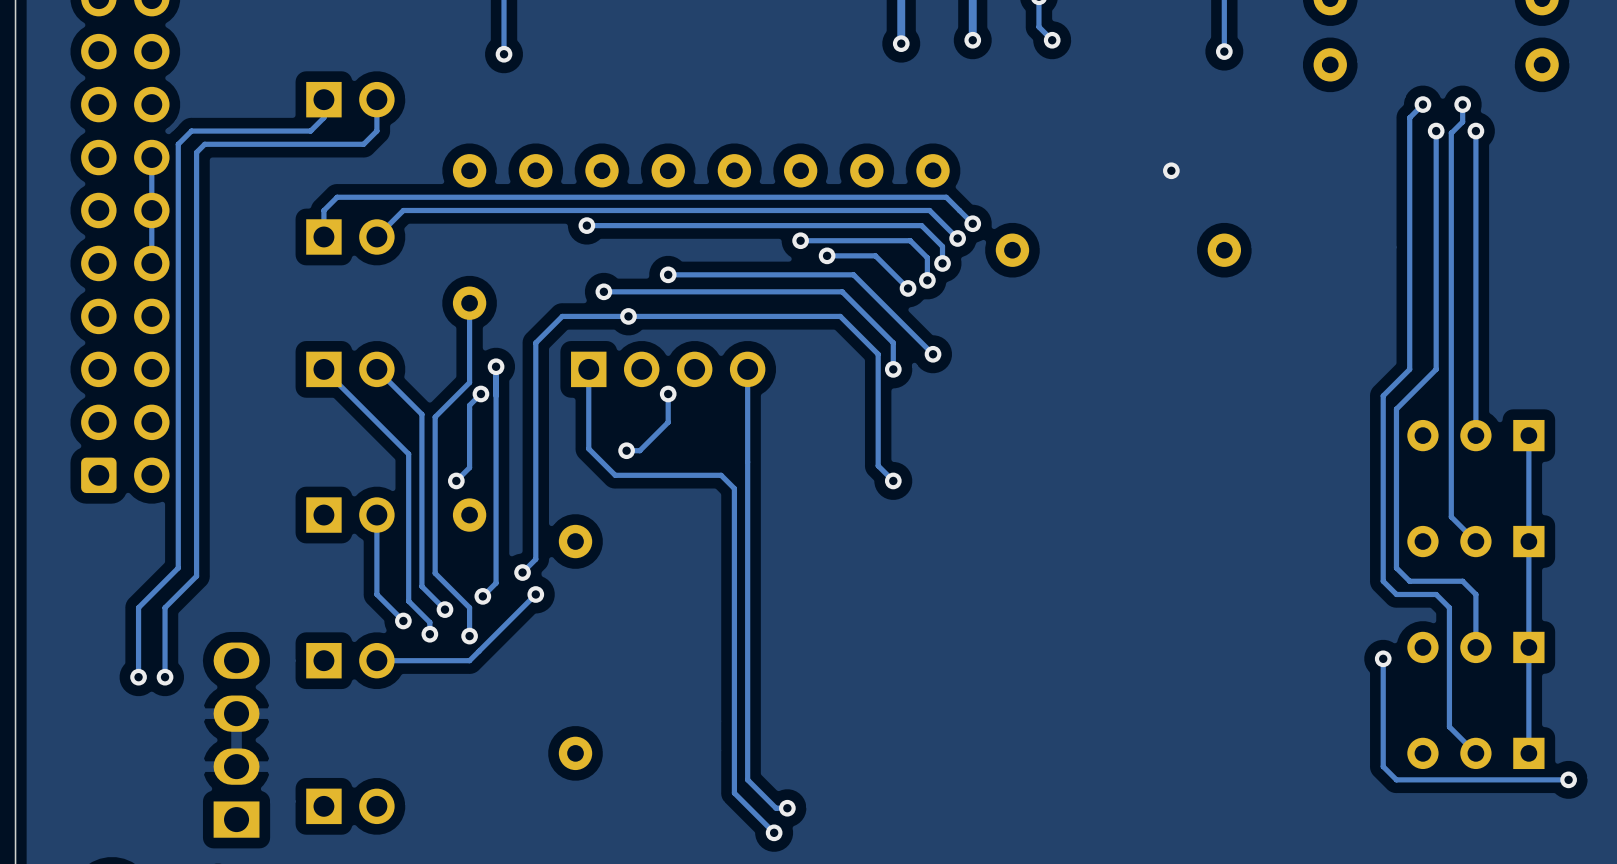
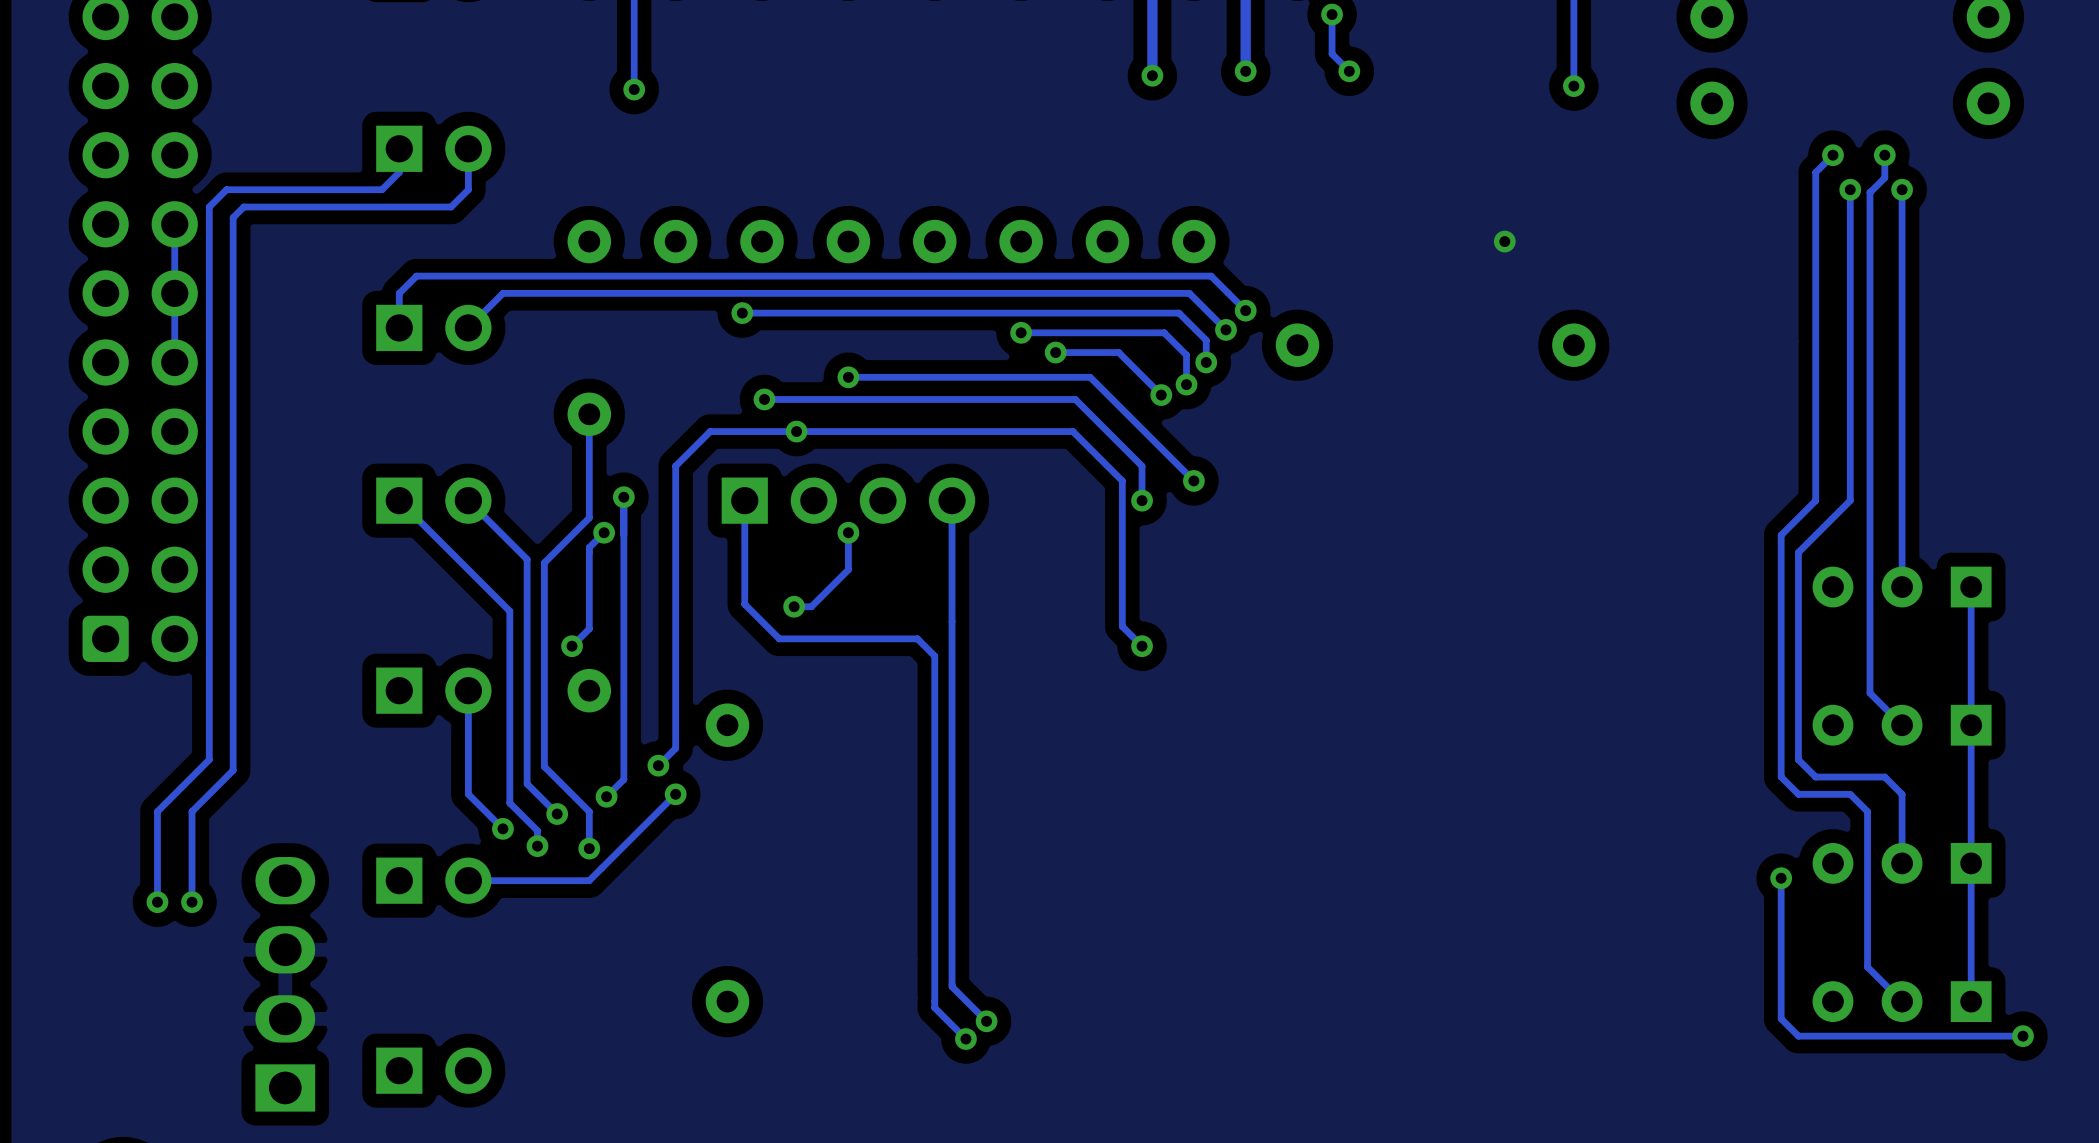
track: (747, 742) (747, 779) (776, 808) (787, 808) -> (952, 986) (986, 1021)
track: (734, 758) (734, 793) (774, 832) -> (934, 1007) (965, 1039)
via: none -> (986, 1021)
via: none -> (965, 1039)
via: (787, 808) -> none
via: (774, 832) -> none

